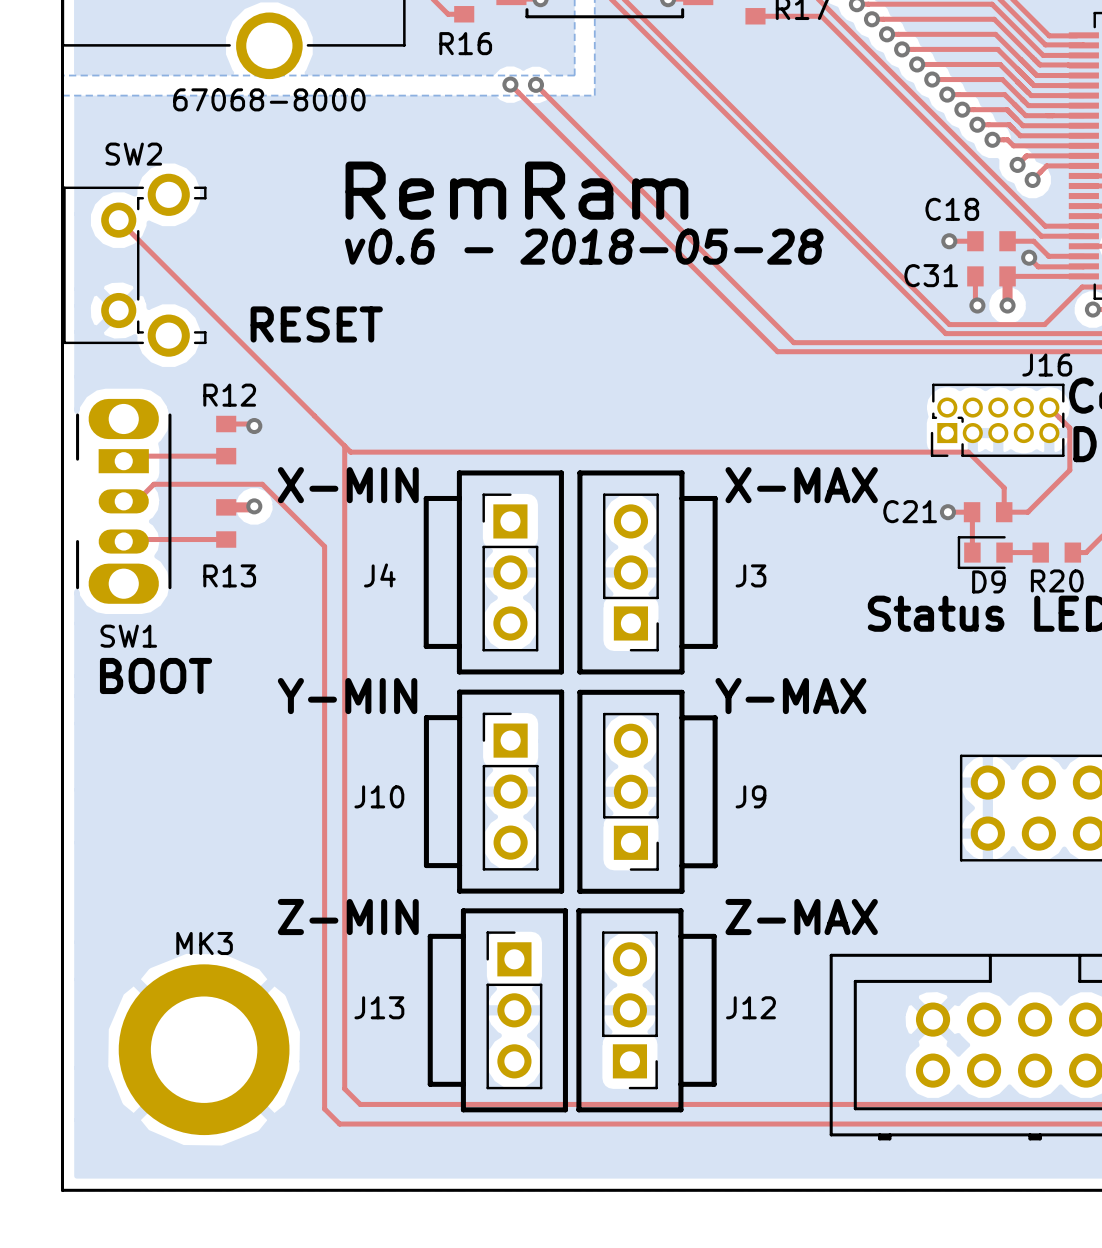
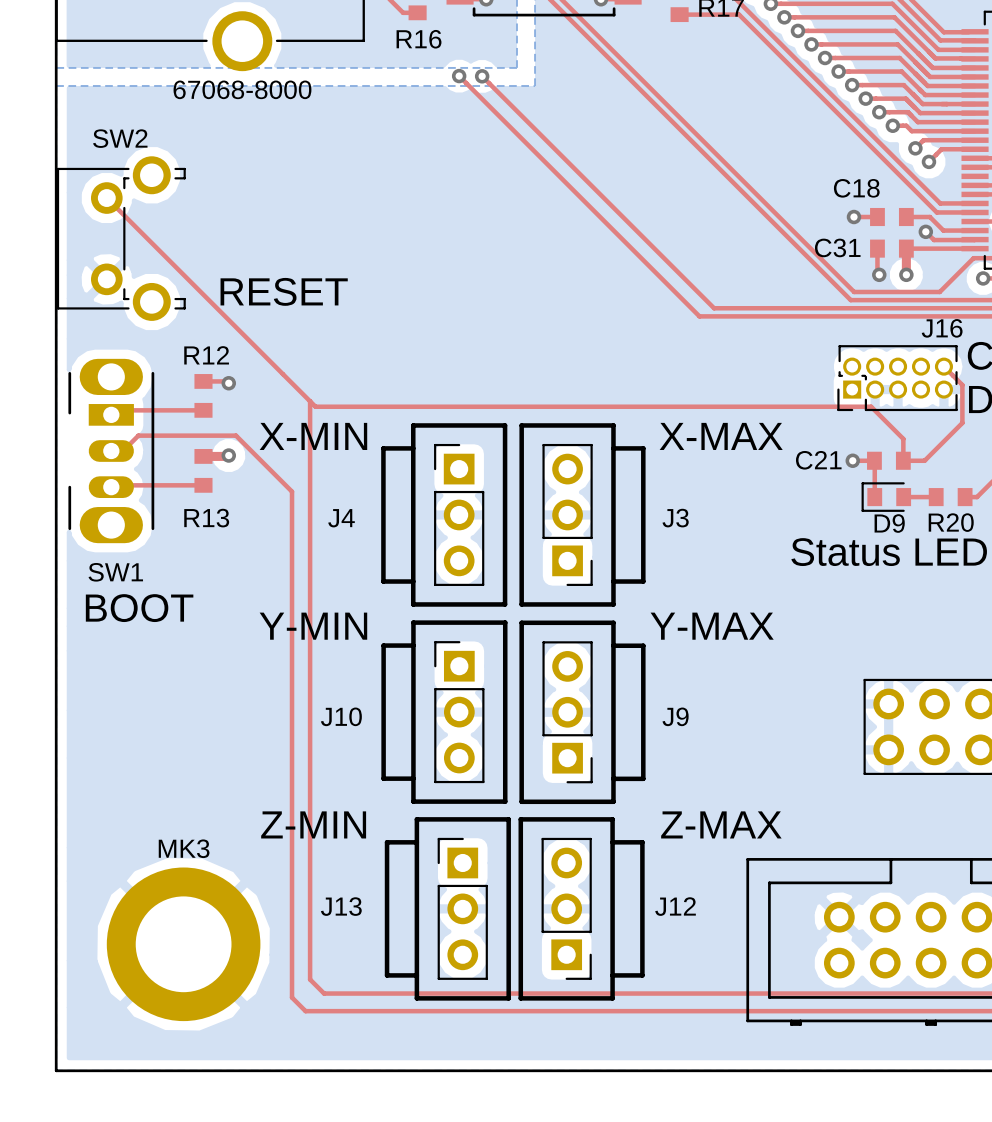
text: RemRam (516, 190) -> none
text: v0.6 - 2018-05-28 (584, 246) -> none

